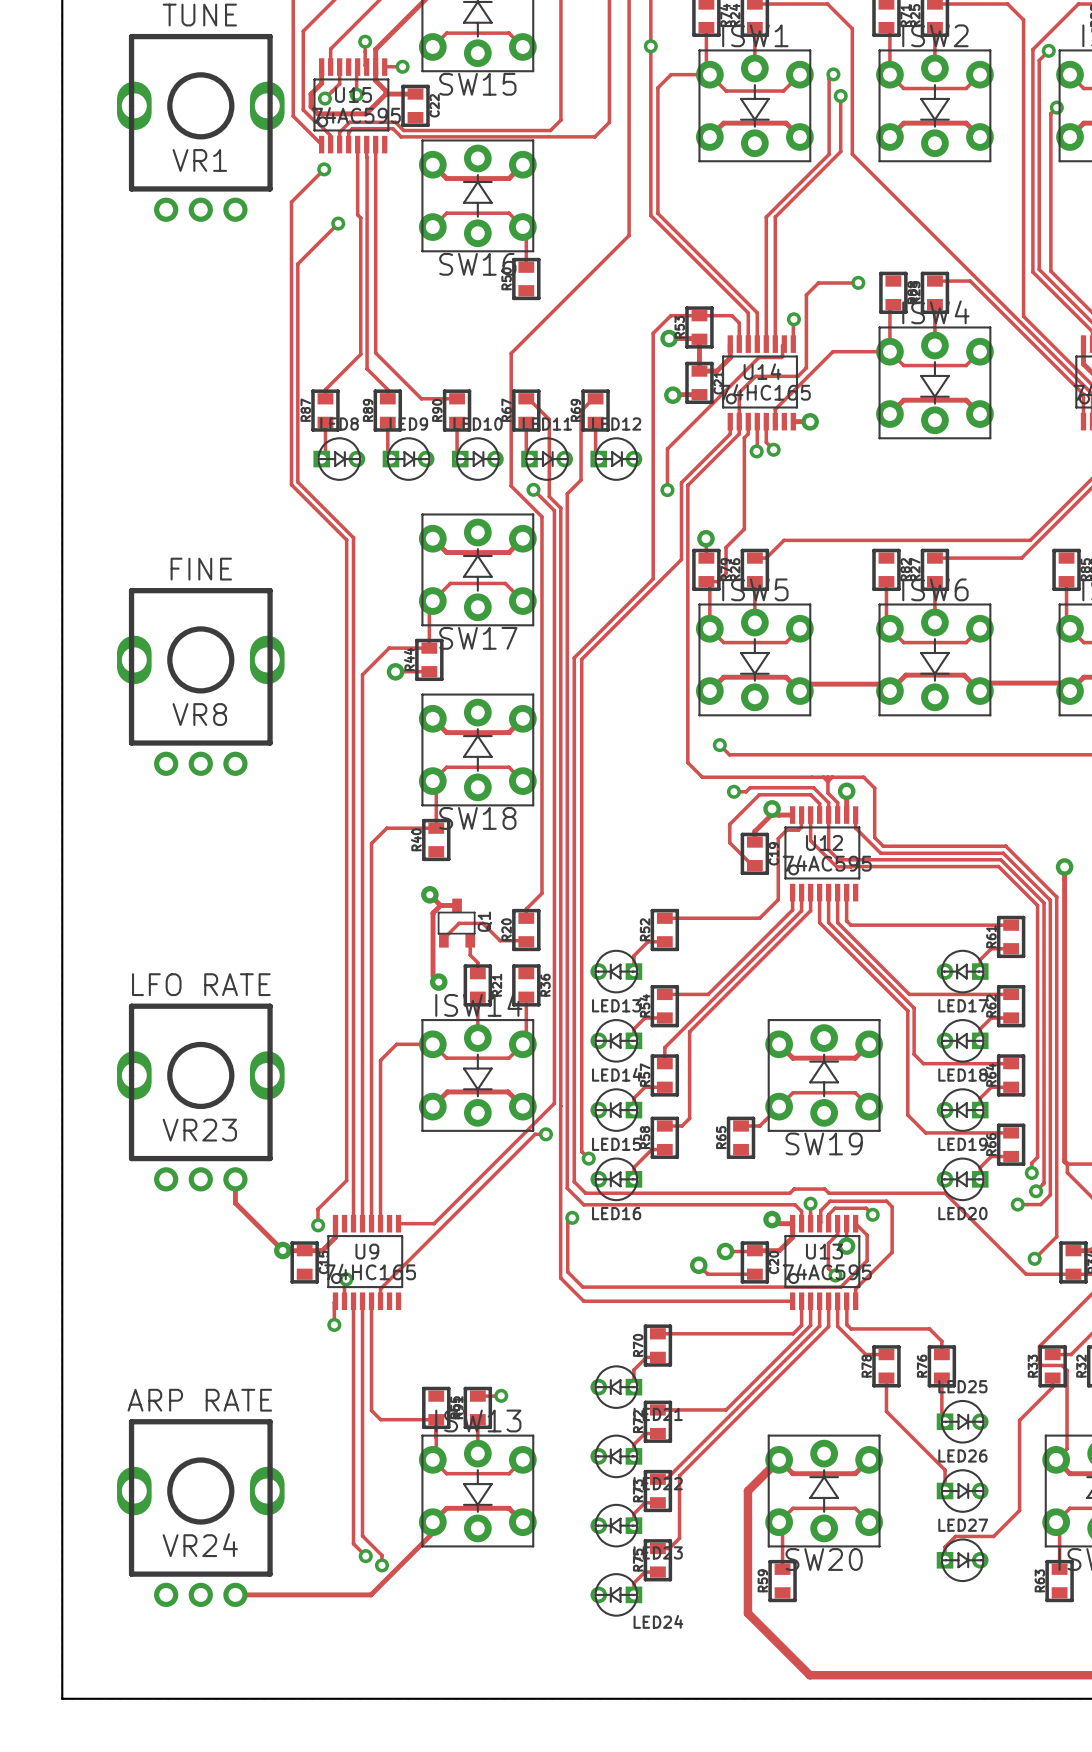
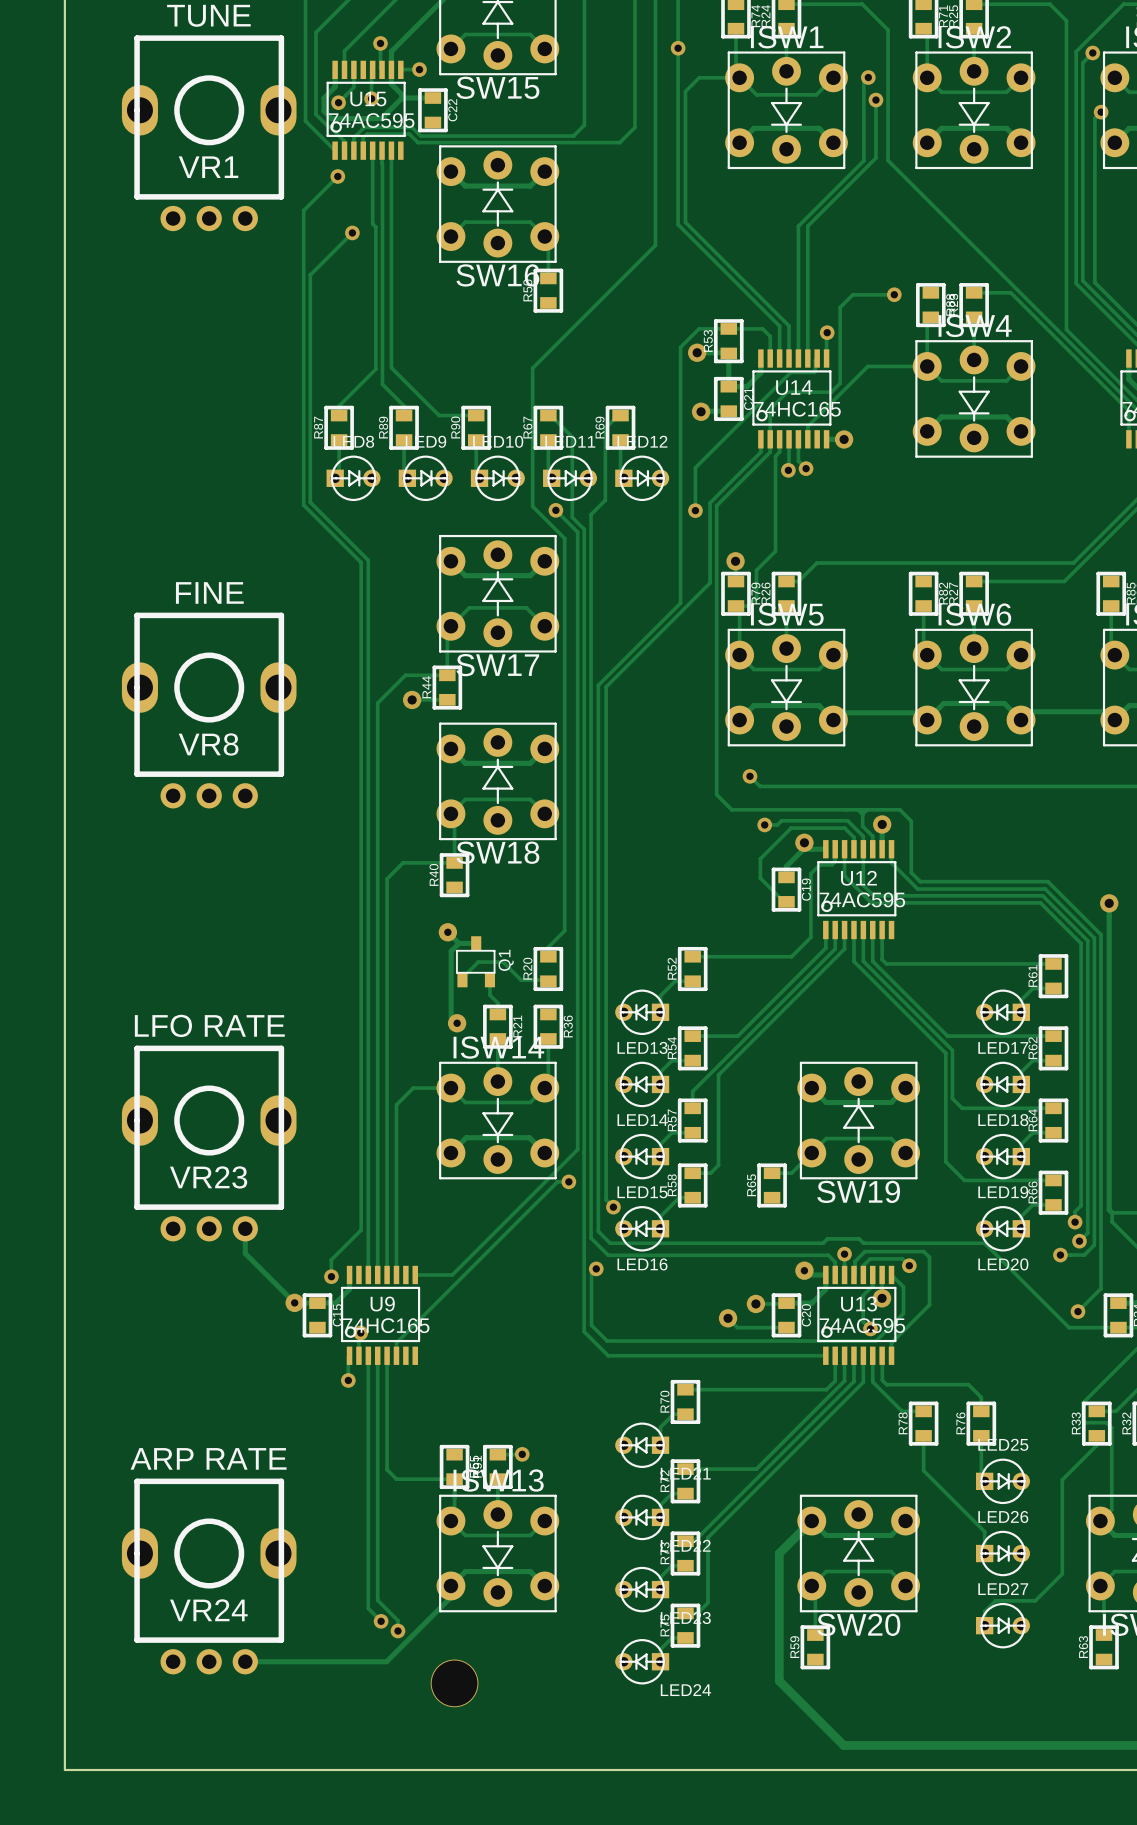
part: none -> (454, 1683)

